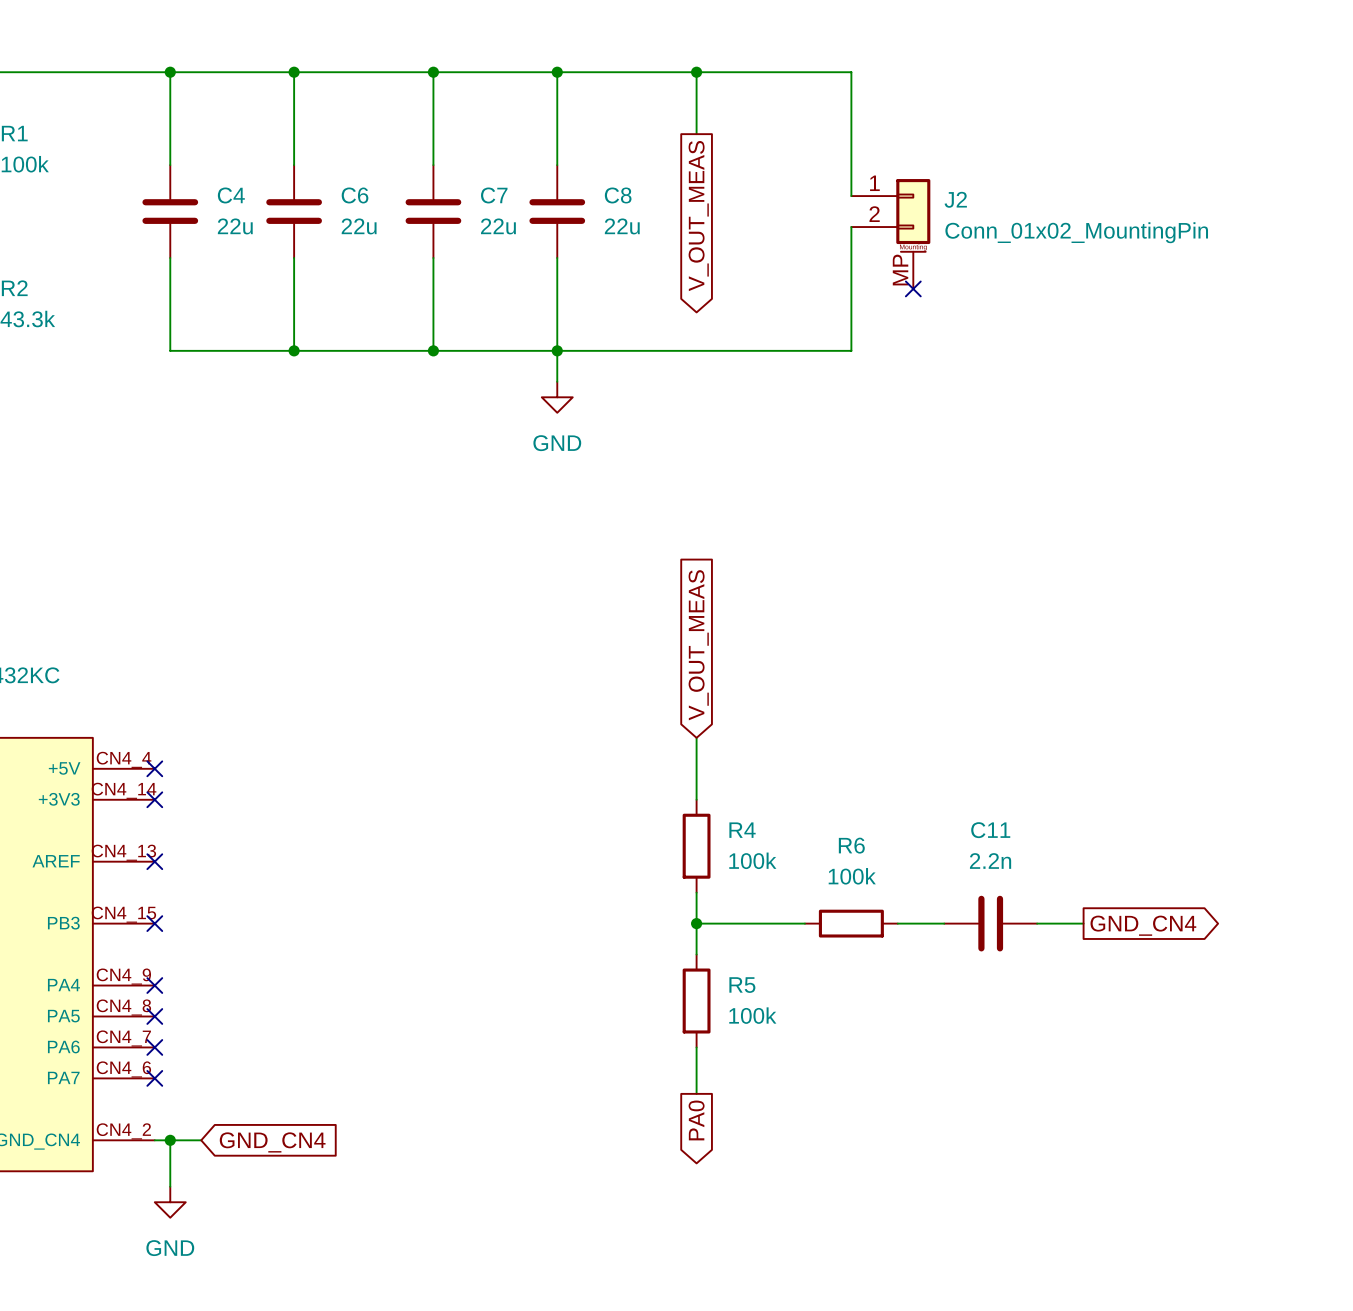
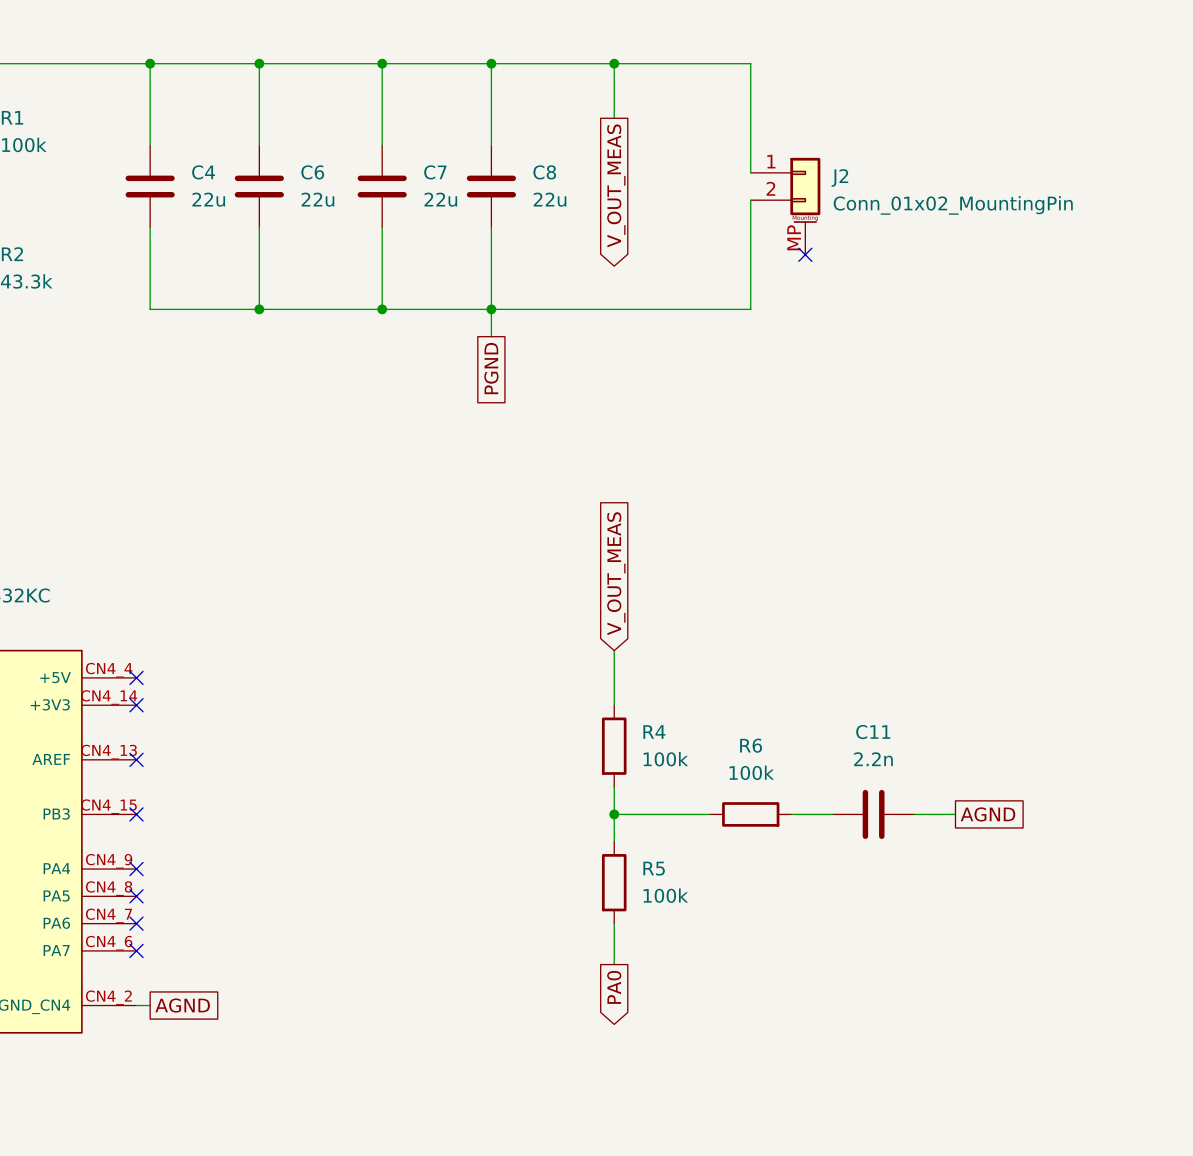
power symbol: GND (557, 397) -> none
global label: none -> PGND (491, 368)
global label shape: output (1143, 925) -> passive (988, 814)
global label: GND_CN4 (1143, 925) -> AGND (988, 814)
junction: (170, 1140) -> none
wire: (201, 1140) (170, 1140) (170, 1186) -> none
global label: none -> AGND (182, 1005)
global label: GND_CN4 (272, 1142) -> none
power symbol: GND (170, 1202) -> none

